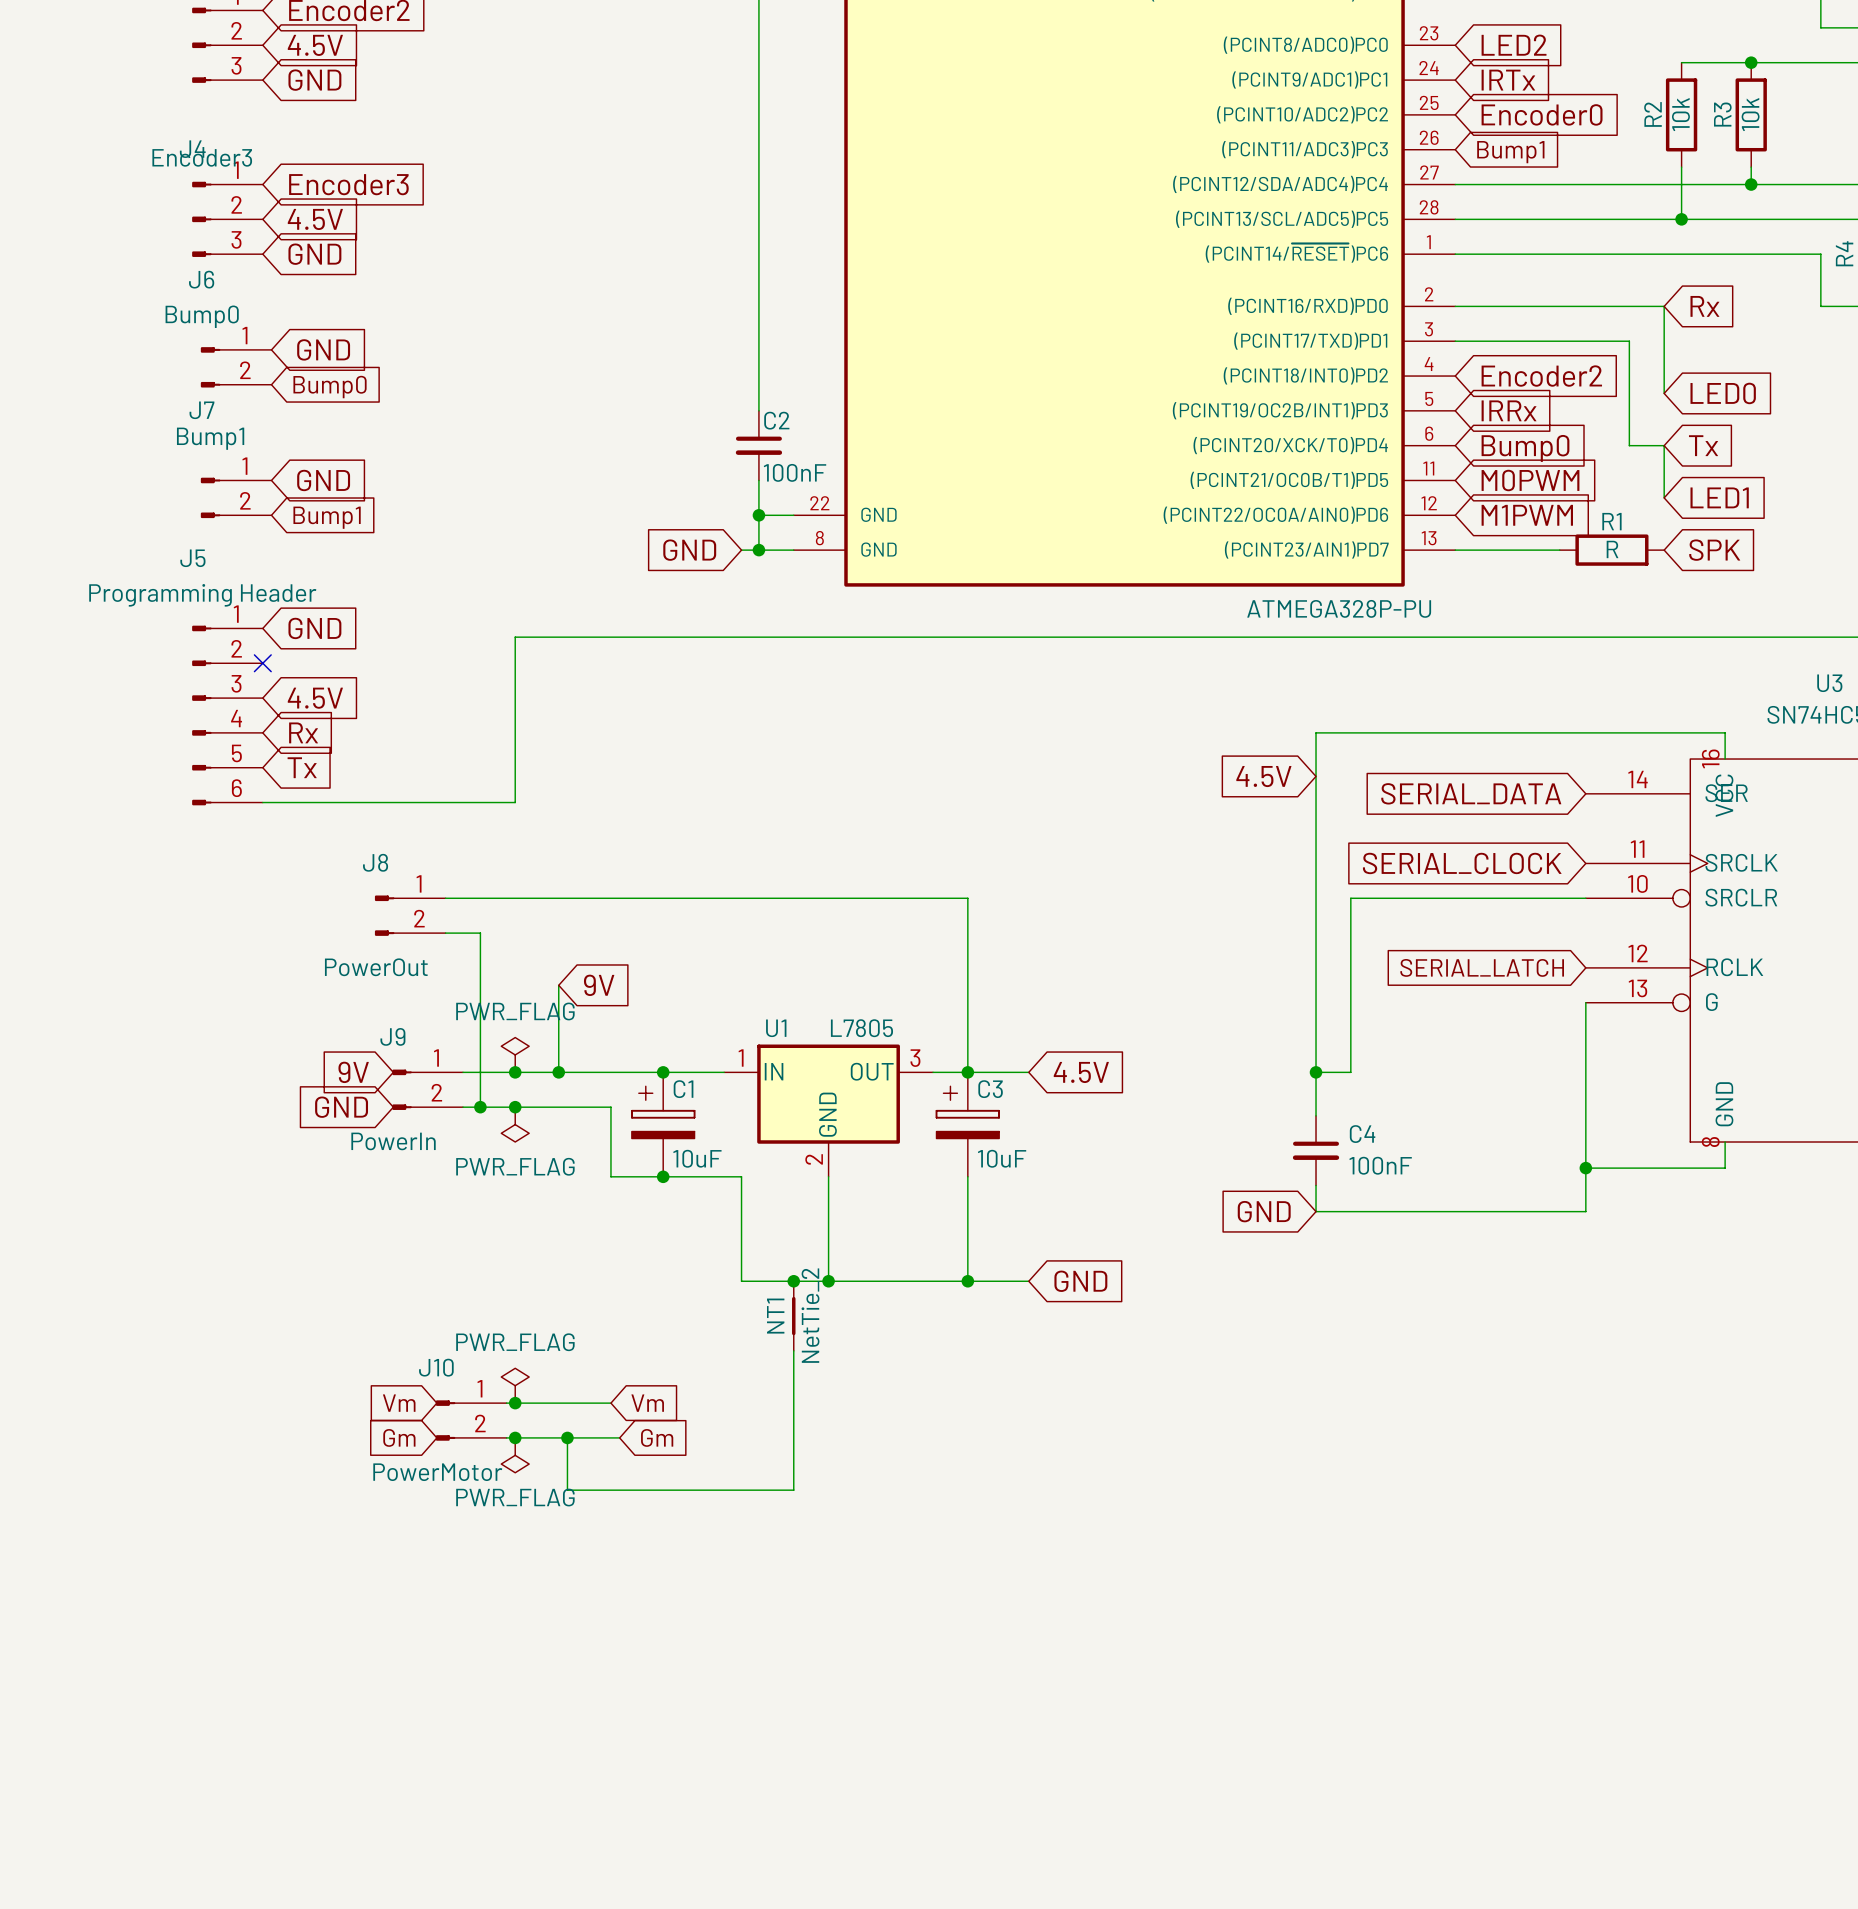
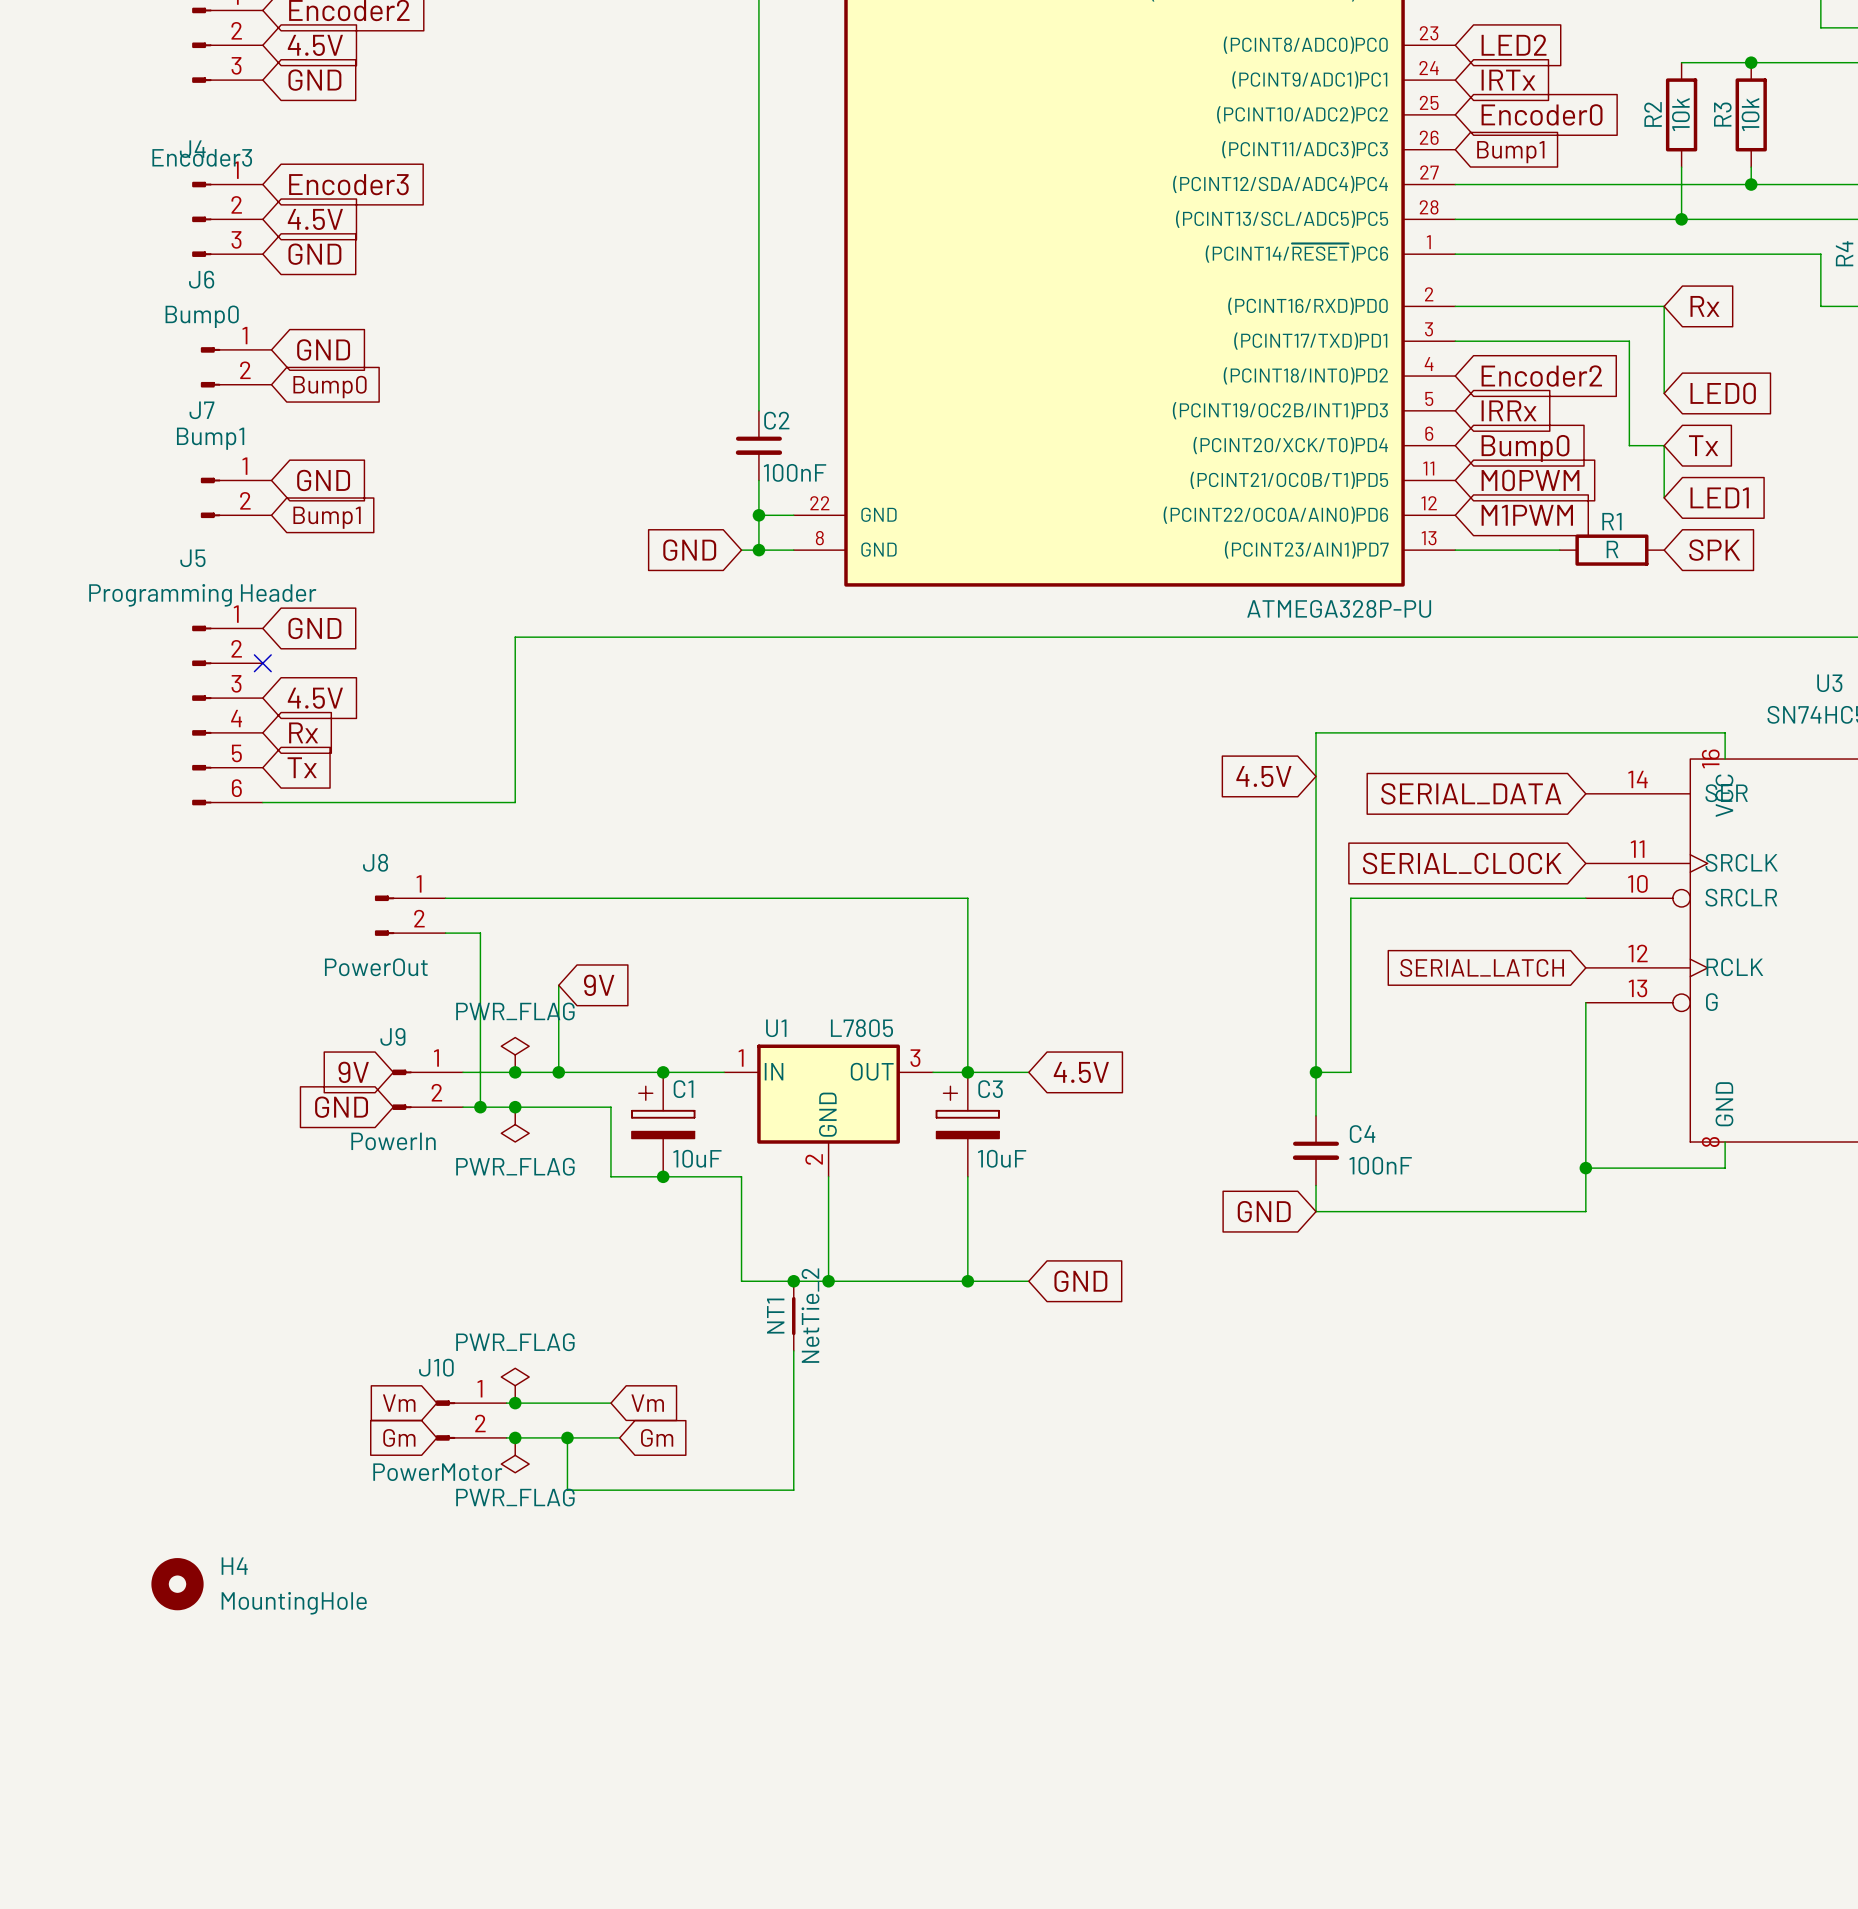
H4: none -> MountingHole (177, 1584)

